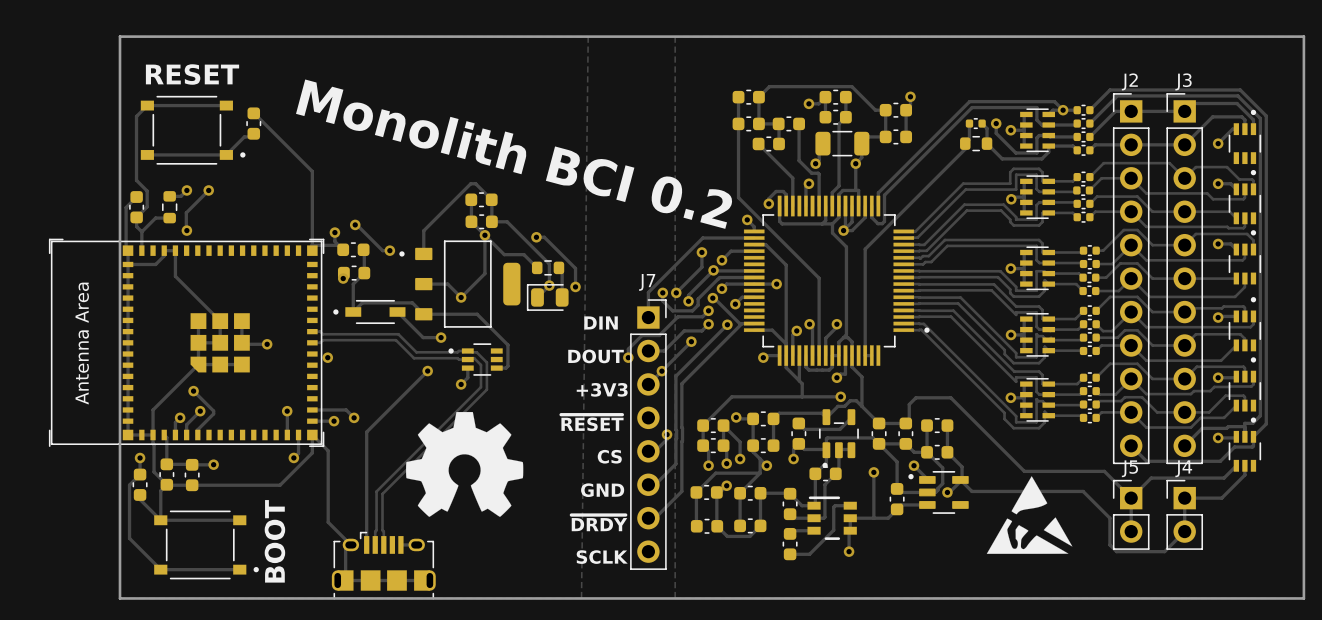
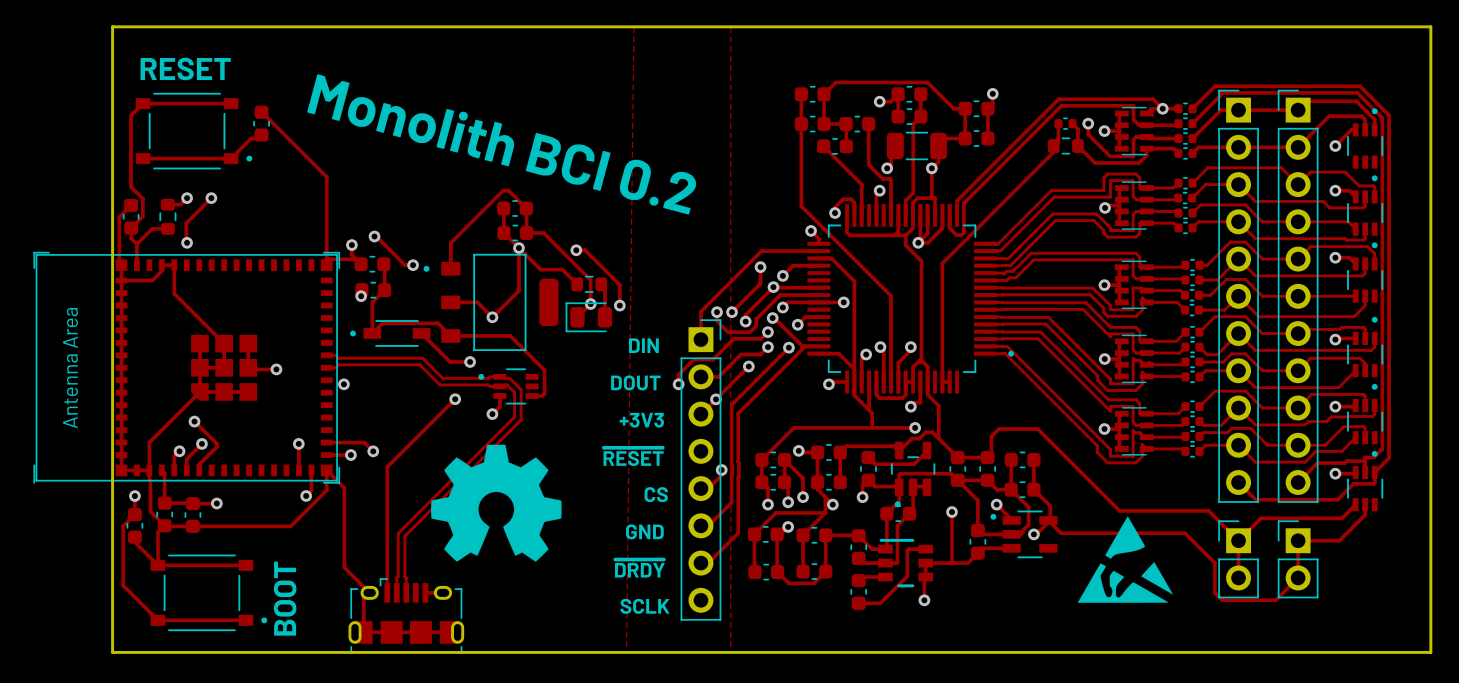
J2 name: J2 (1129, 81) -> none
J3 name: J3 (1183, 81) -> none
J7 name: J7 (647, 282) -> none
J5 name: J5 (1129, 468) -> none
J4 name: J4 (1183, 468) -> none

